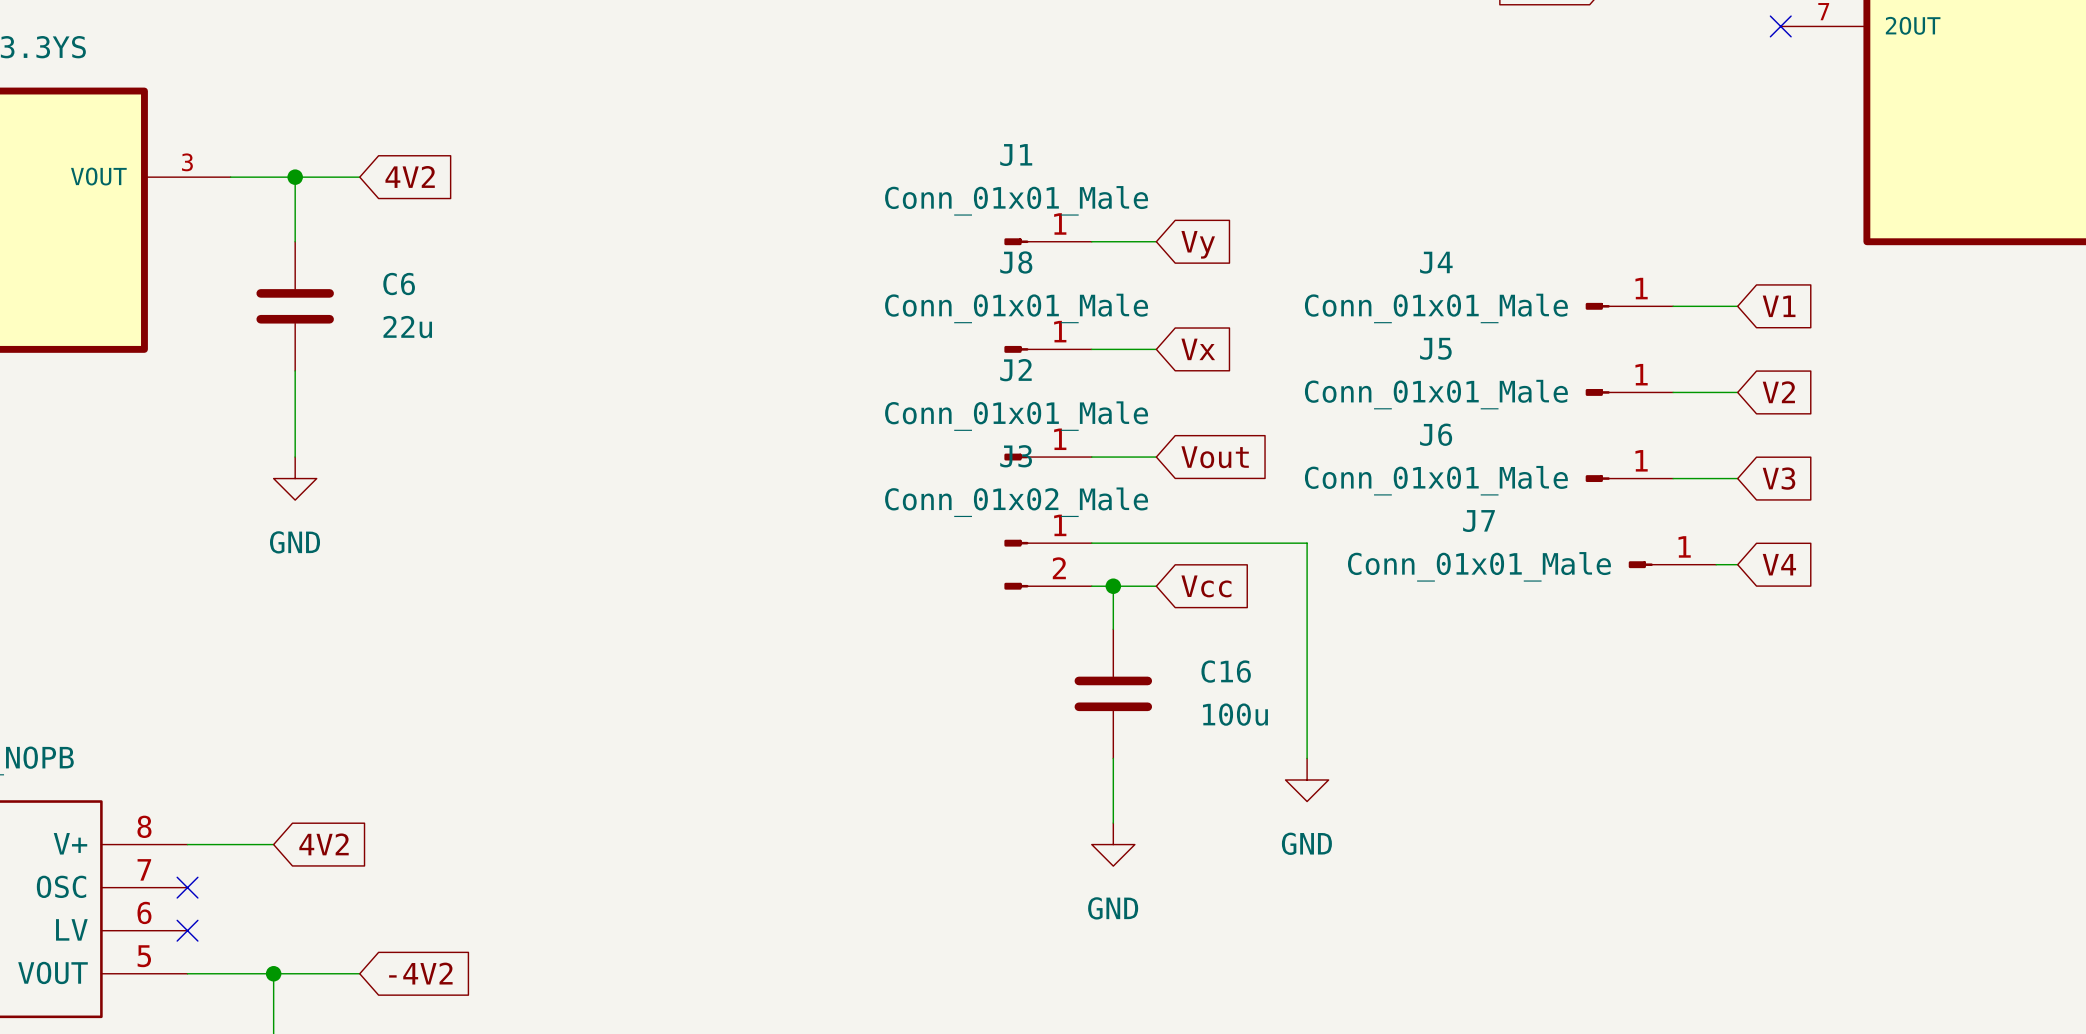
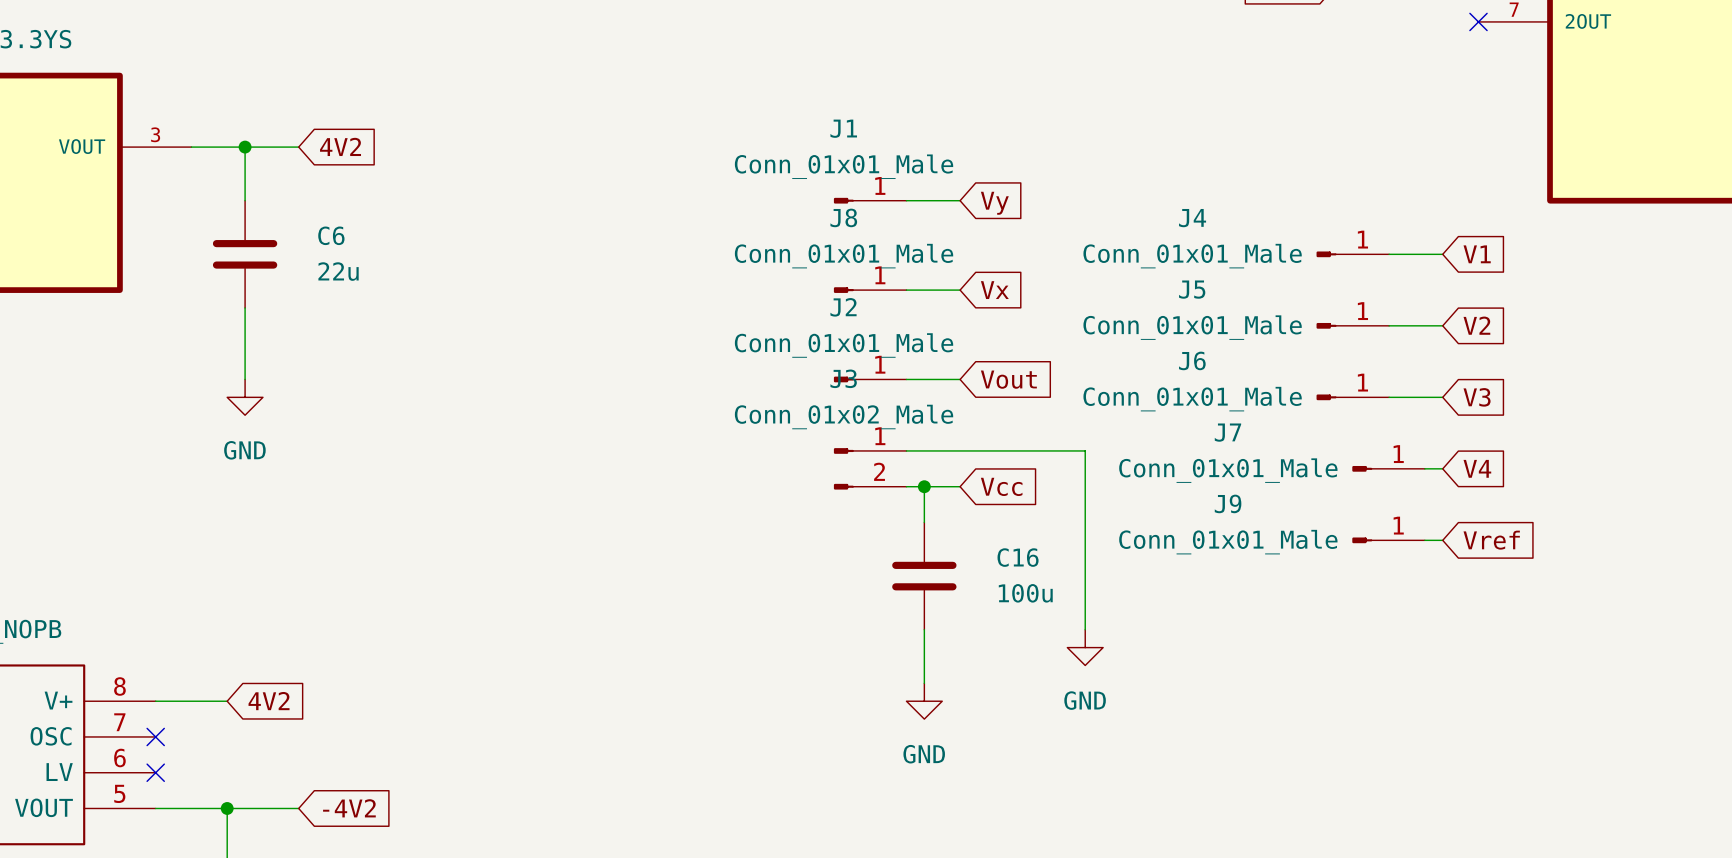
J9: none -> Conn_01x01_Male (1388, 540)
wire: none -> (1424, 540) (1442, 540)
global label: none -> Vref (1491, 540)

